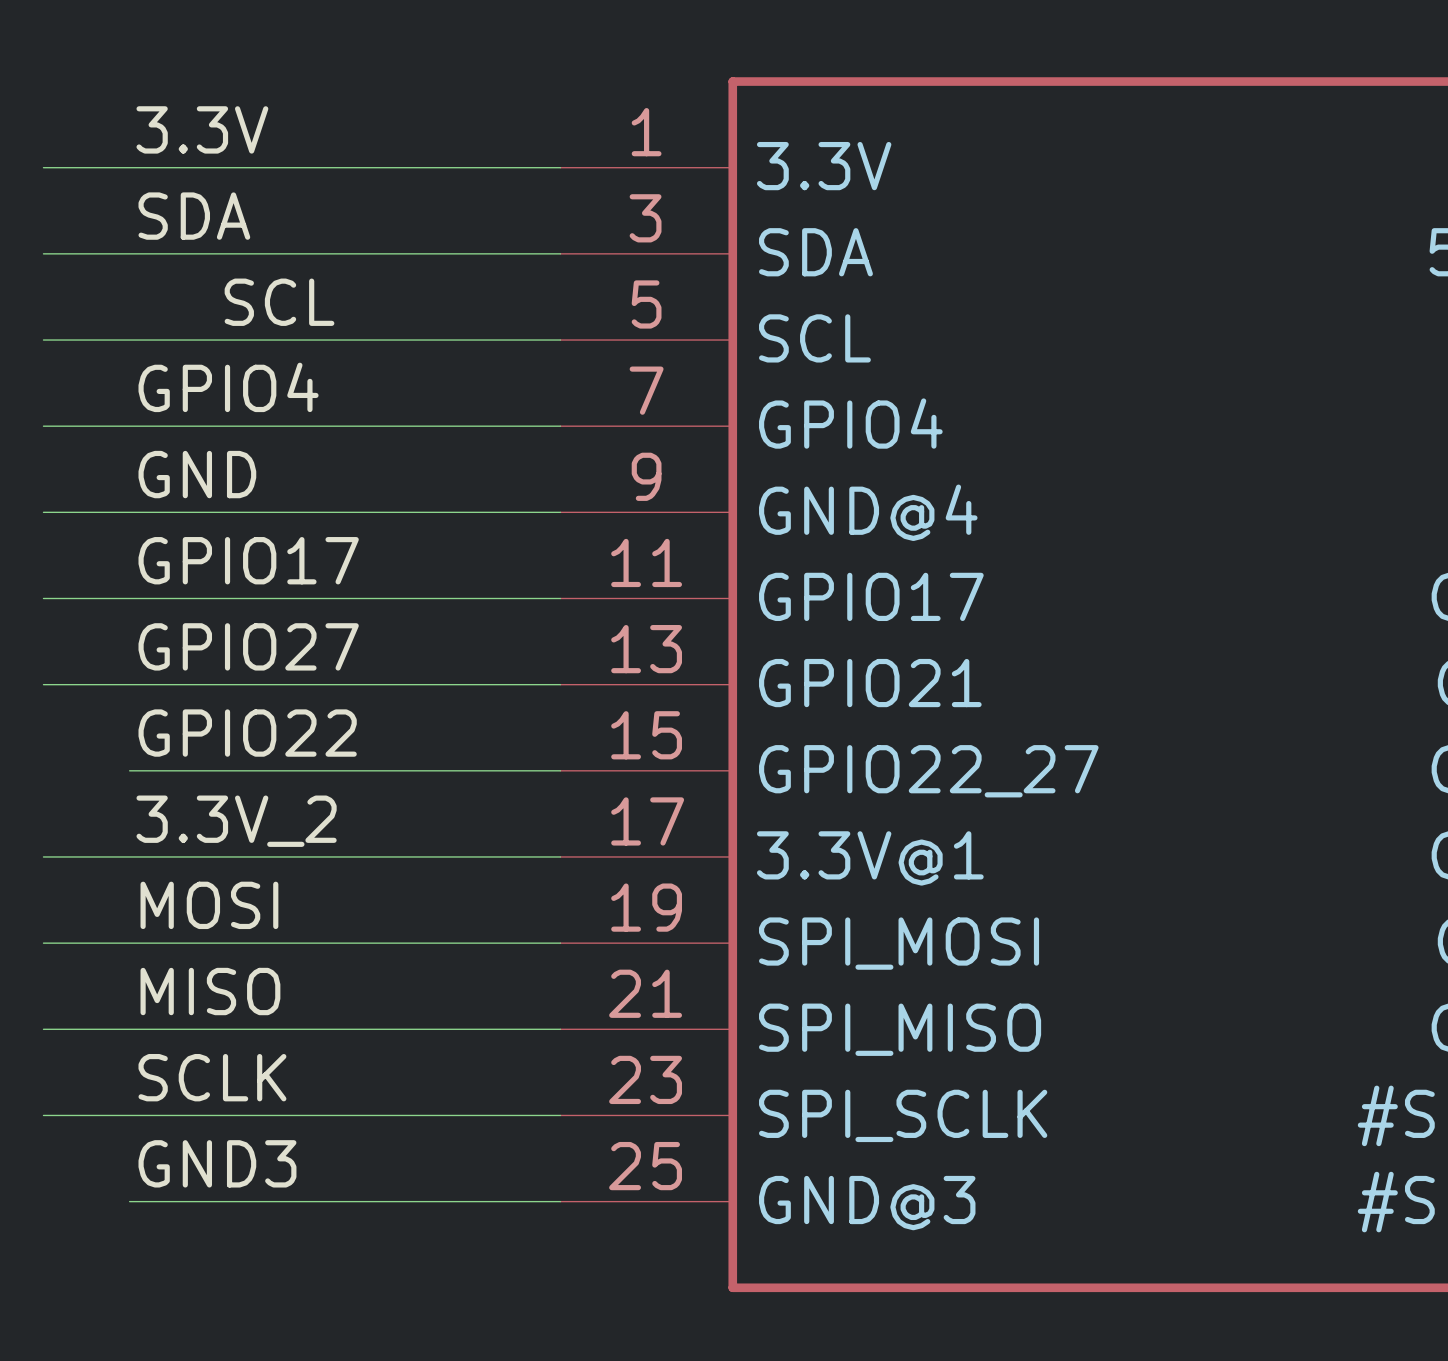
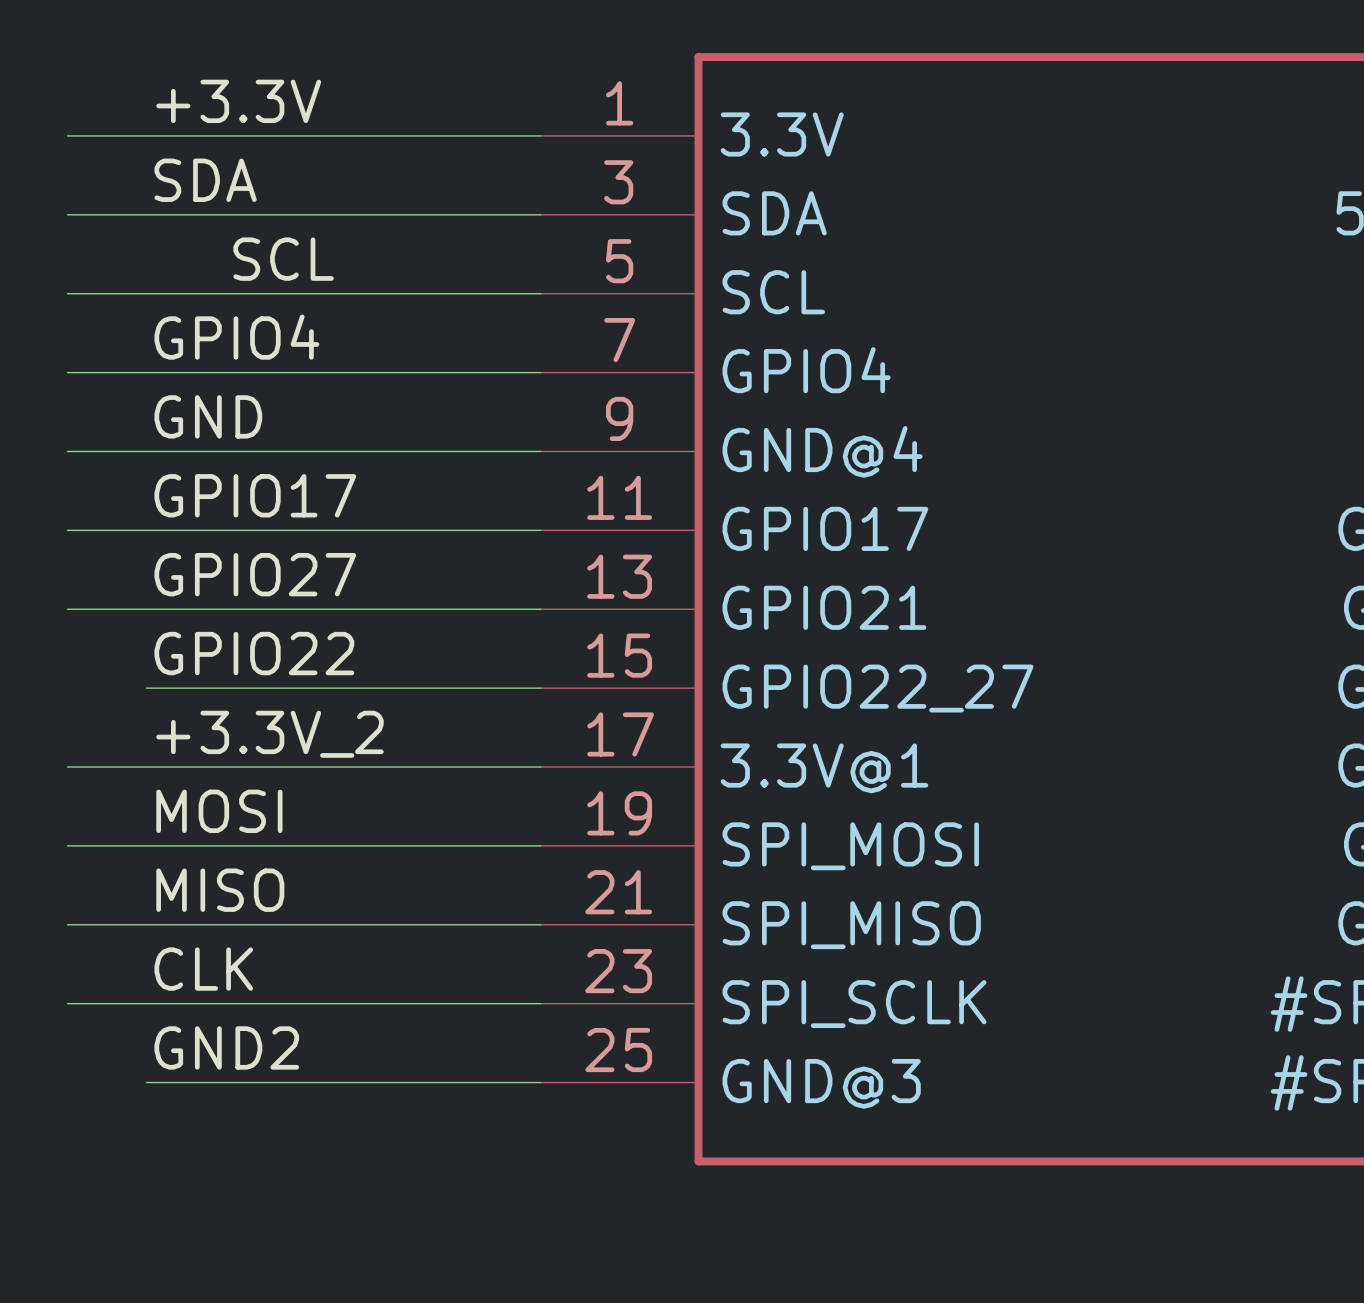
label: 3.3V (202, 129) -> +3.3V (238, 101)
label: 3.3V_2 (236, 821) -> +3.3V_2 (270, 734)
label: SCLK (212, 1077) -> CLK (203, 969)
label: GND3 (217, 1163) -> GND2 (226, 1047)

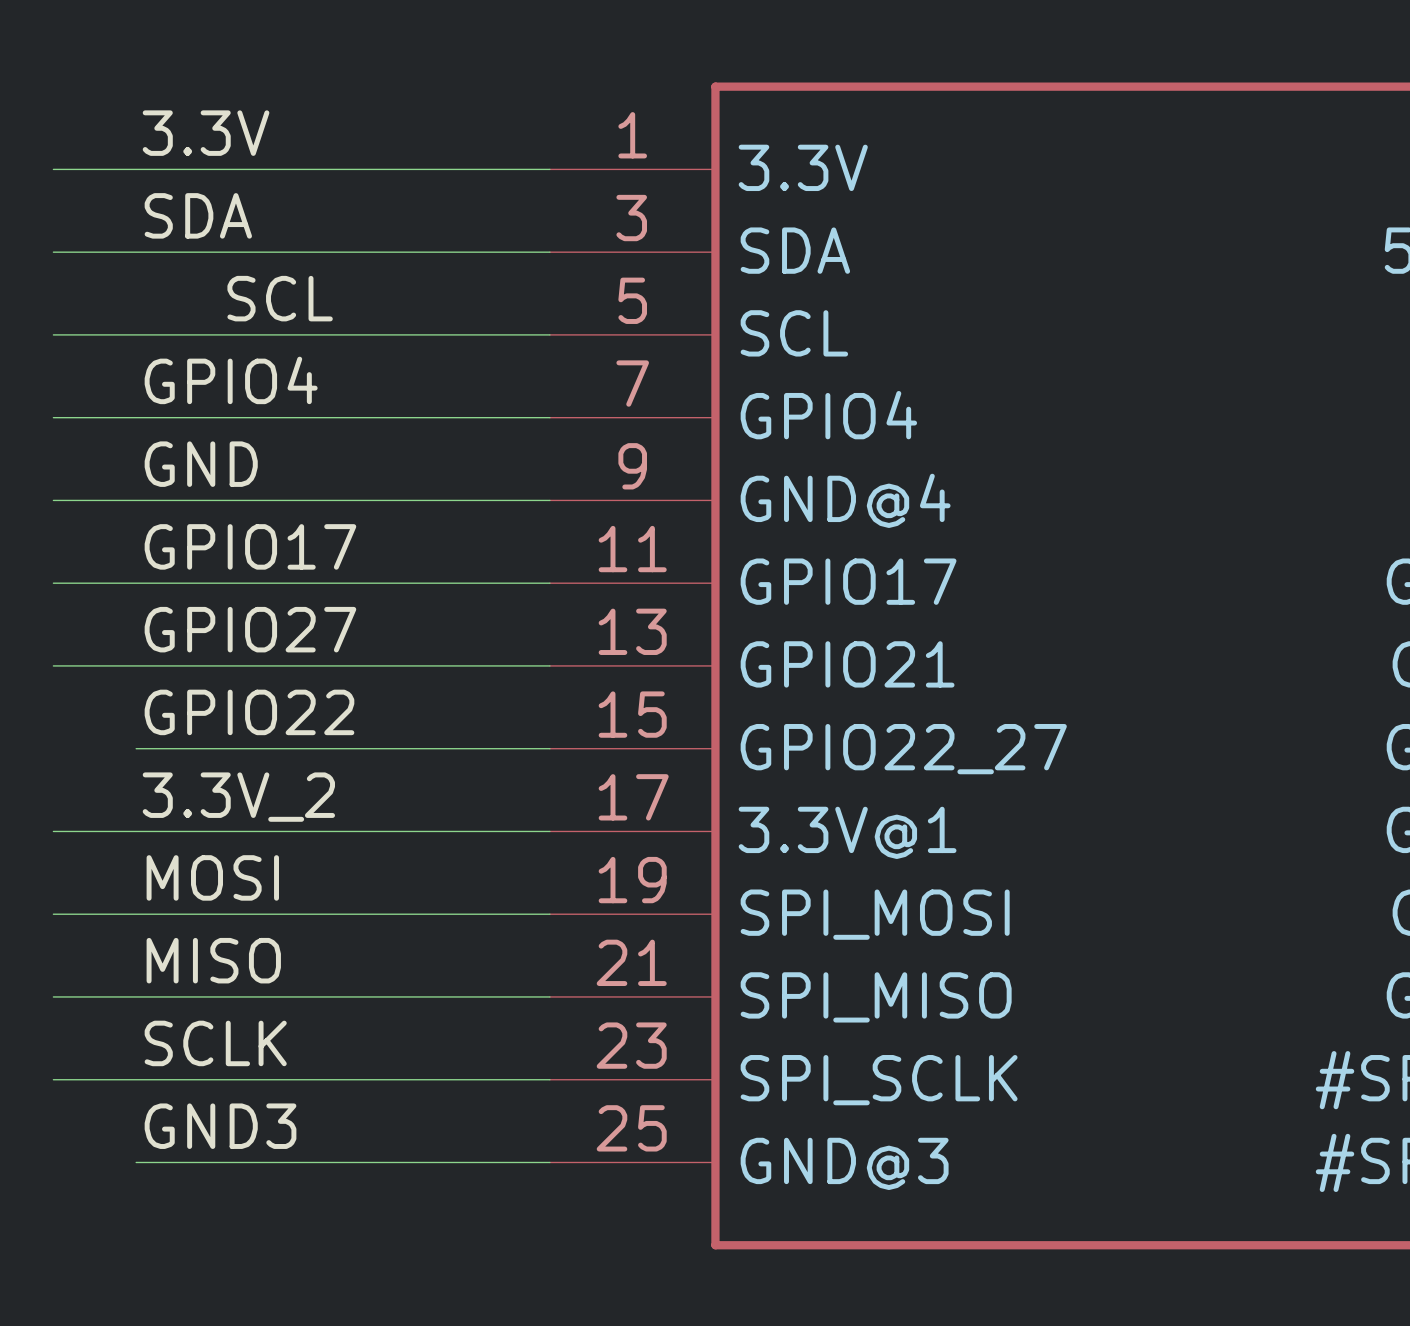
label: +3.3V (238, 101) -> 3.3V (206, 133)
label: +3.3V_2 (270, 734) -> 3.3V_2 (238, 797)
label: CLK (203, 969) -> SCLK (215, 1043)
label: GND2 (226, 1047) -> GND3 (220, 1126)

